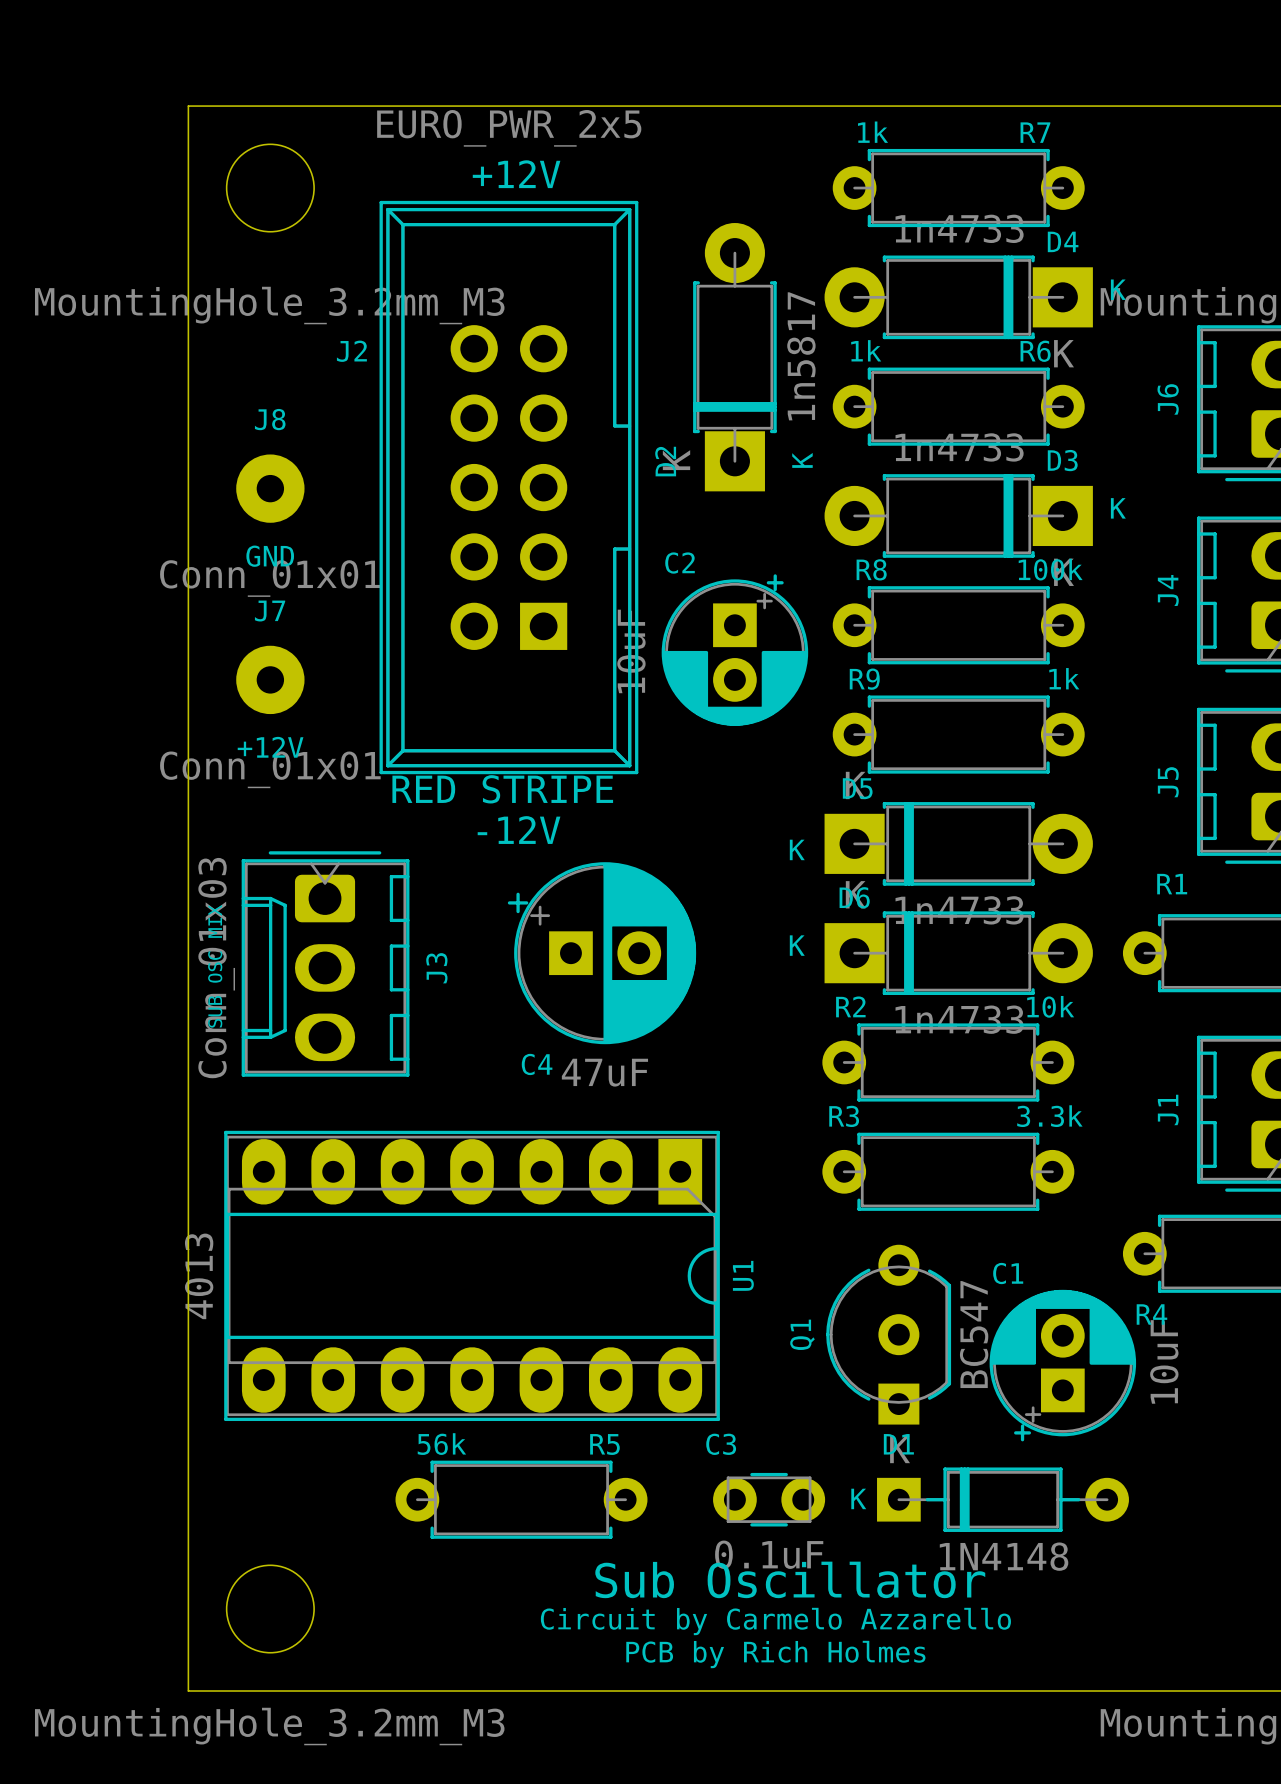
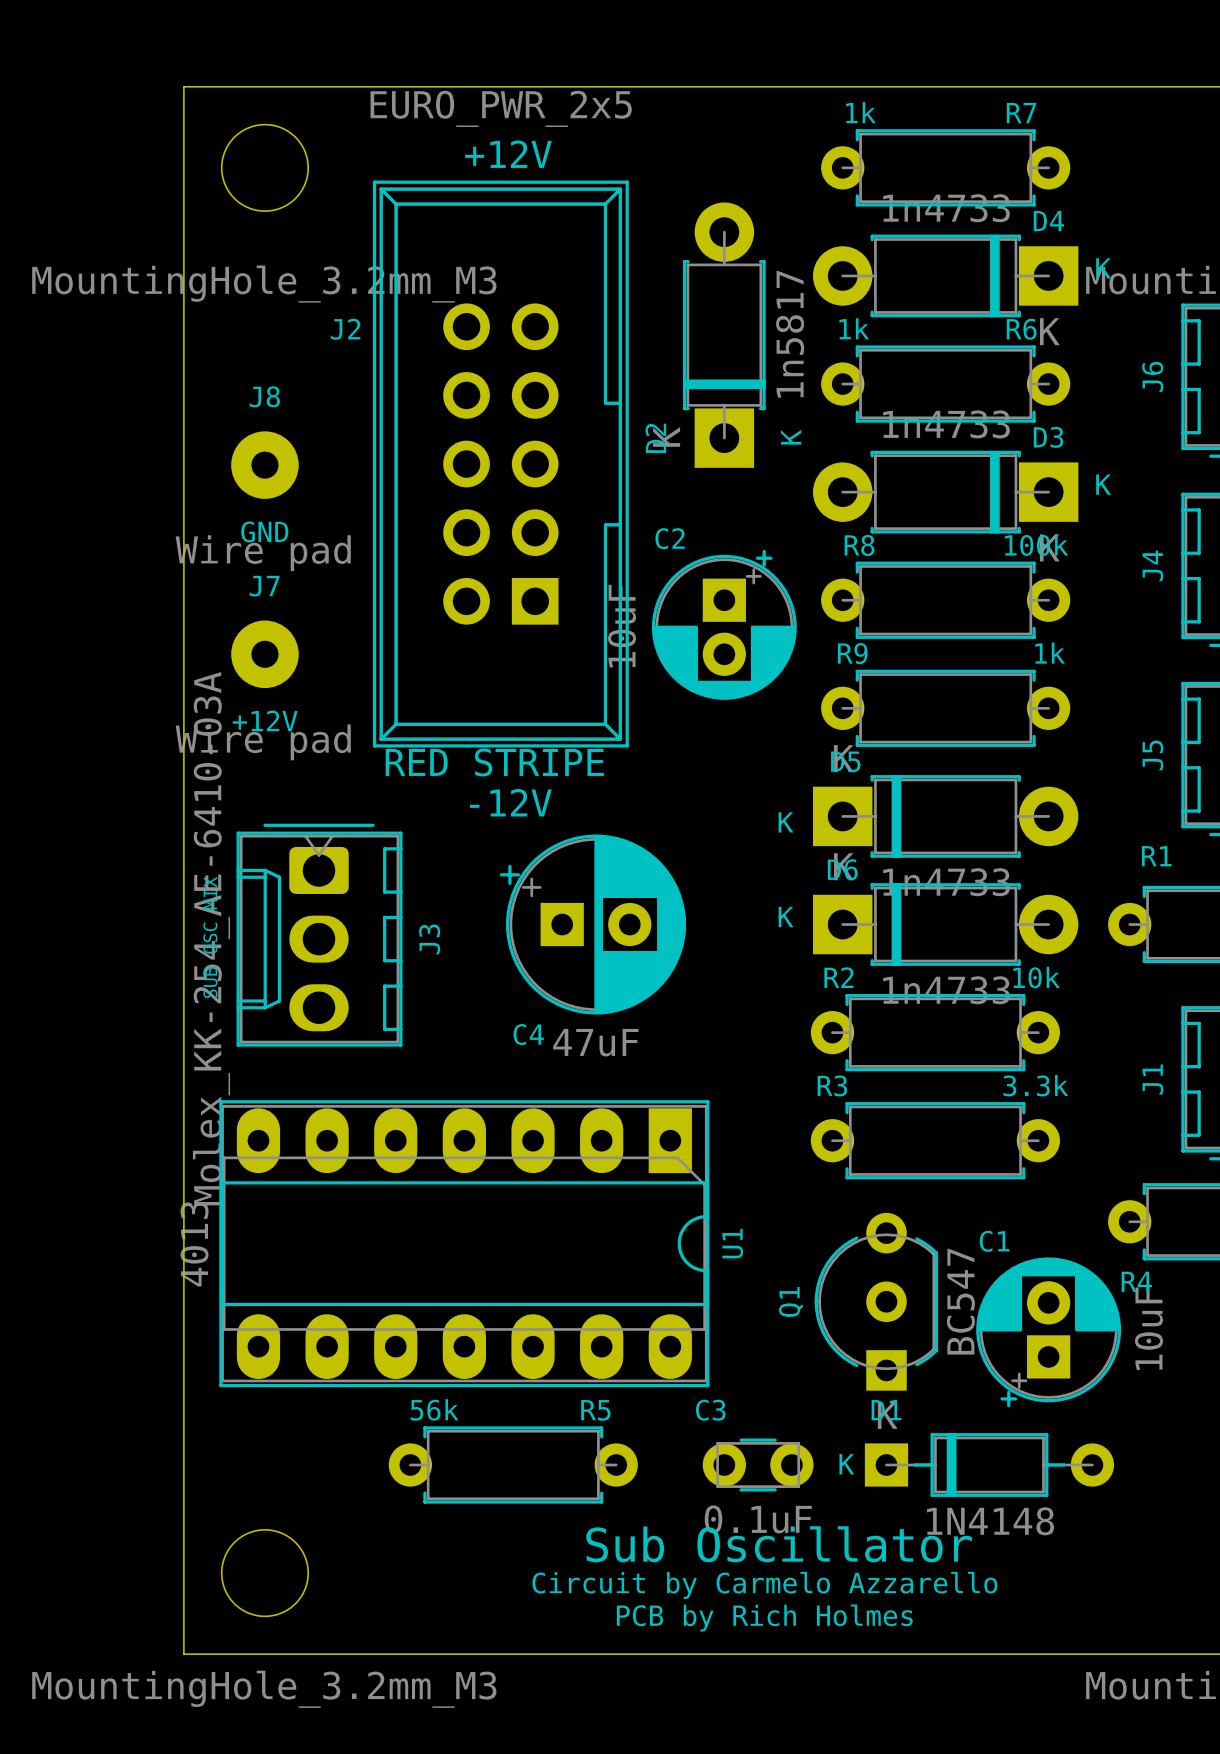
J8 value: Conn_01x01 (270, 578) -> Wire pad (263, 553)
J7 value: Conn_01x01 (270, 769) -> Wire pad (263, 742)
J3 value: Conn_01x03 (216, 968) -> Molex_KK-254_AE-6410-03A (211, 938)

